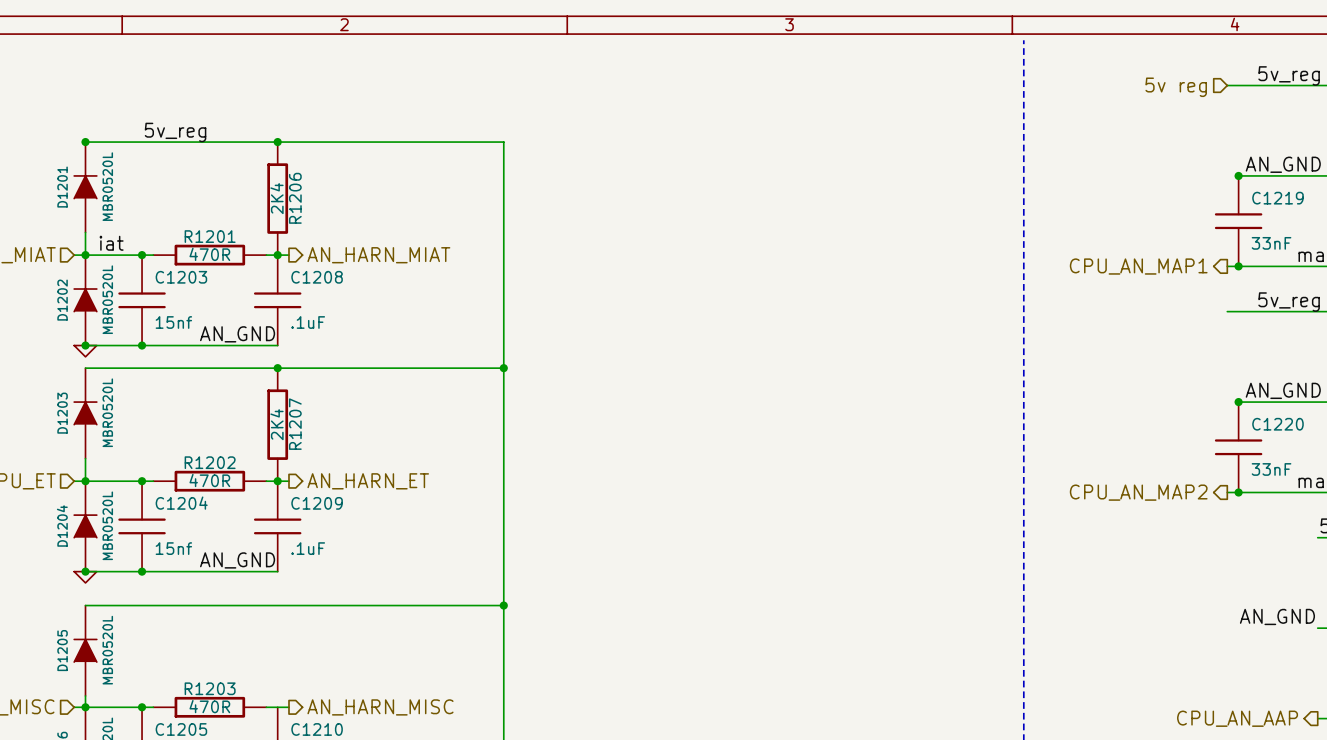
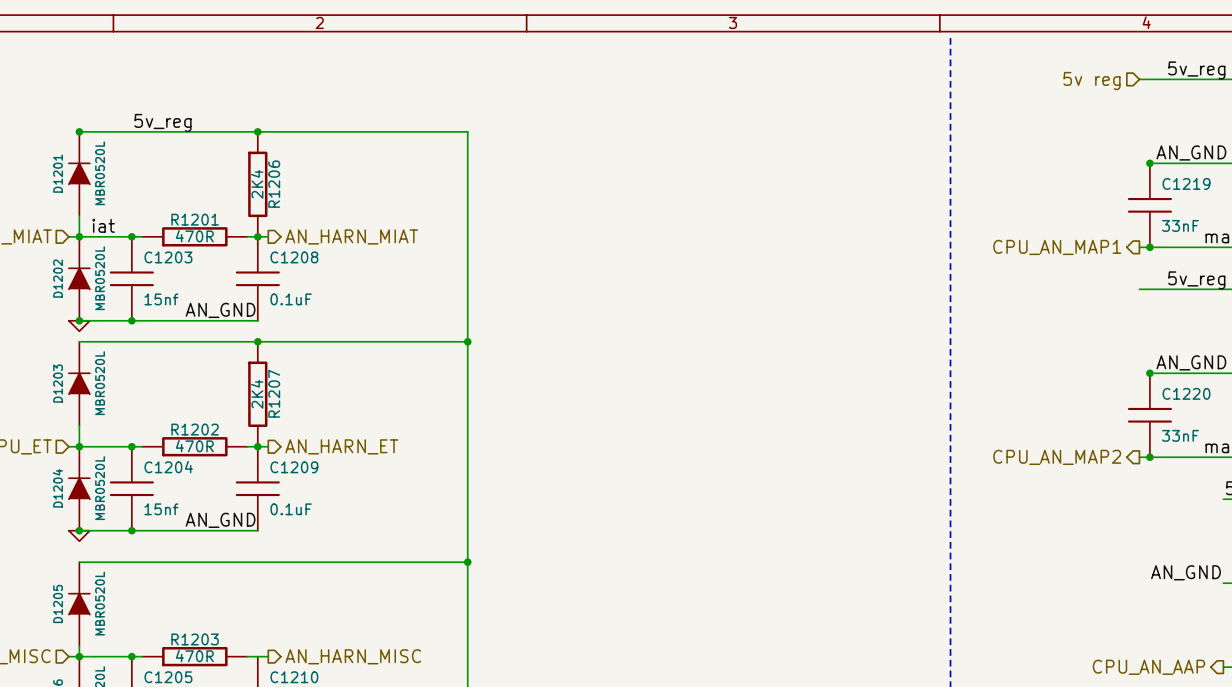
C1208 value: .1uF (308, 322) -> 0.1uF (291, 299)
C1209 value: .1uF (308, 548) -> 0.1uF (291, 509)

